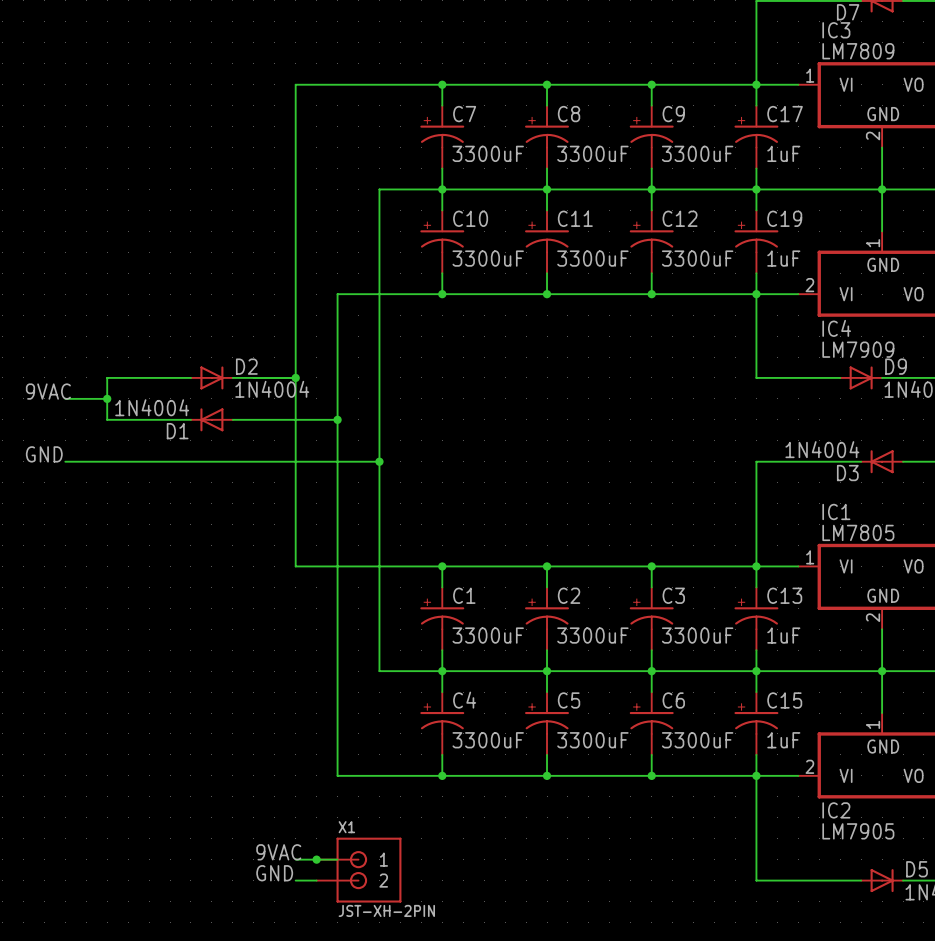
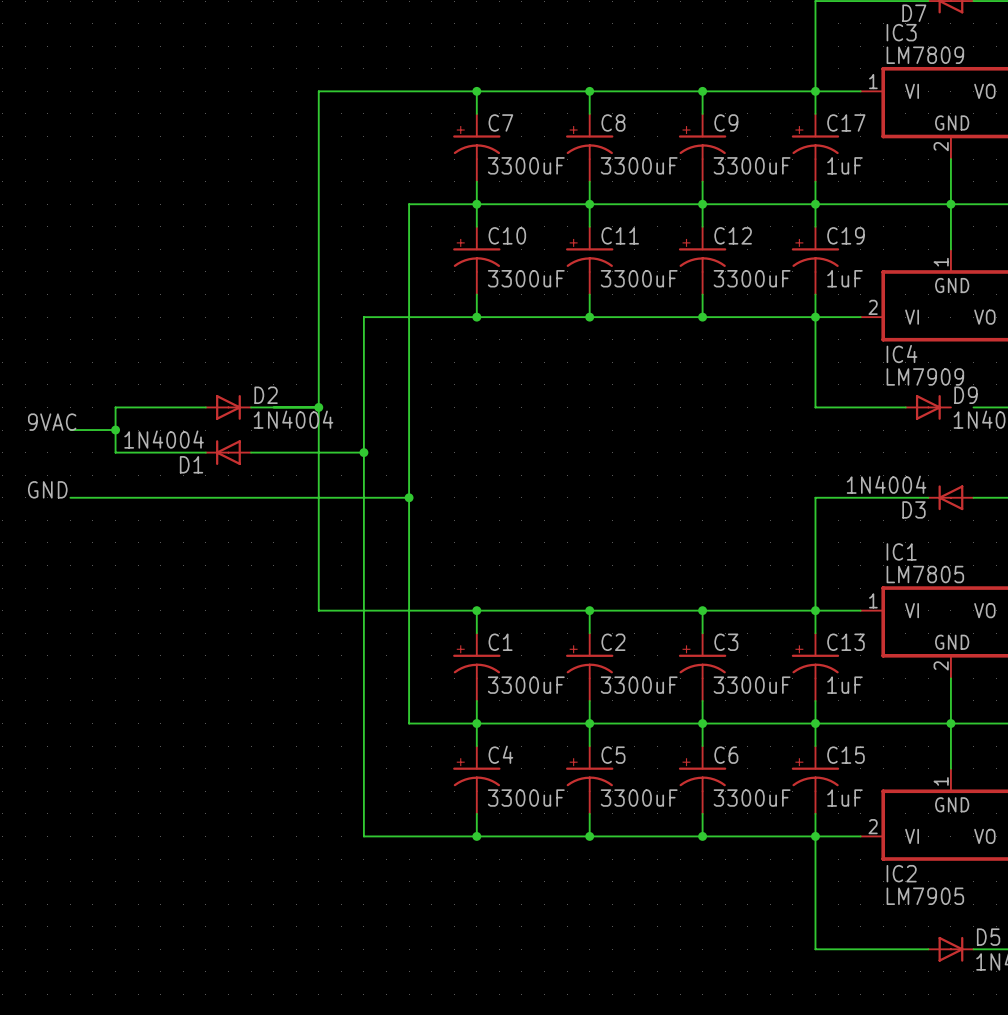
wire: (882, 377) (903, 377) -> none
label: 9VAC (278, 852) -> none
wire: (295, 859) (337, 859) -> none
junction: (316, 859) -> none
X1: JST-XH-2PIN (359, 870) -> none
label: GND (274, 873) -> none
wire: (295, 880) (316, 880) -> none

